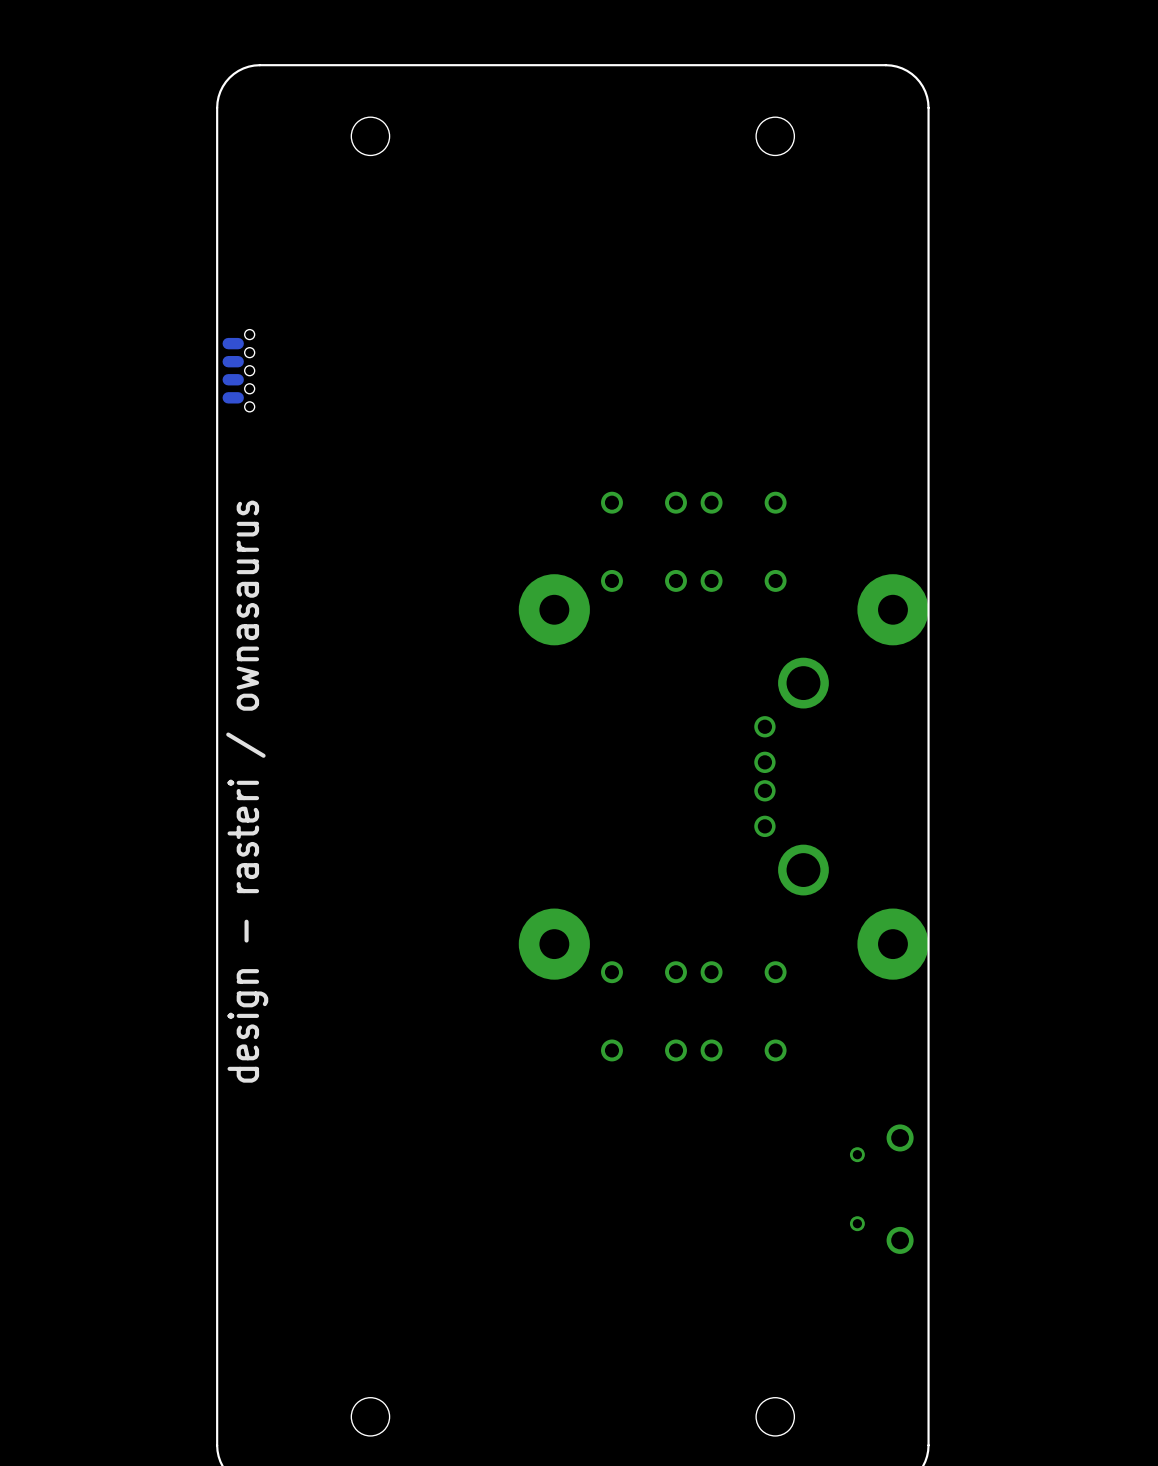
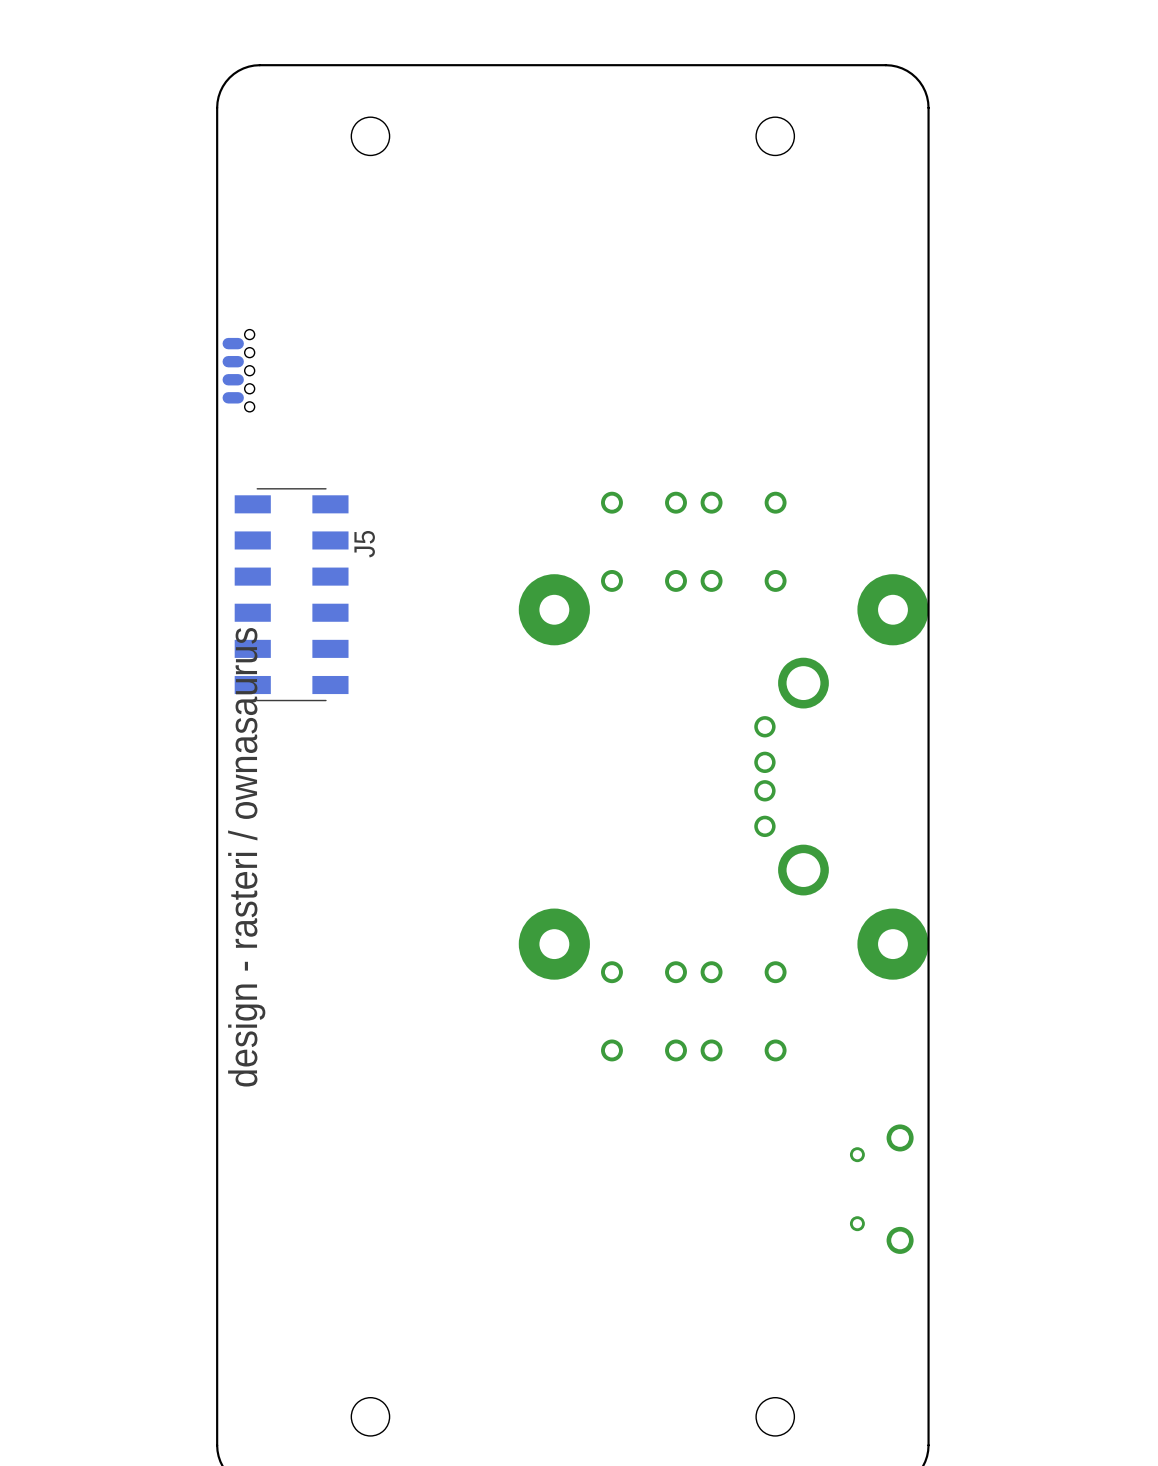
J5: none -> (291, 594)

